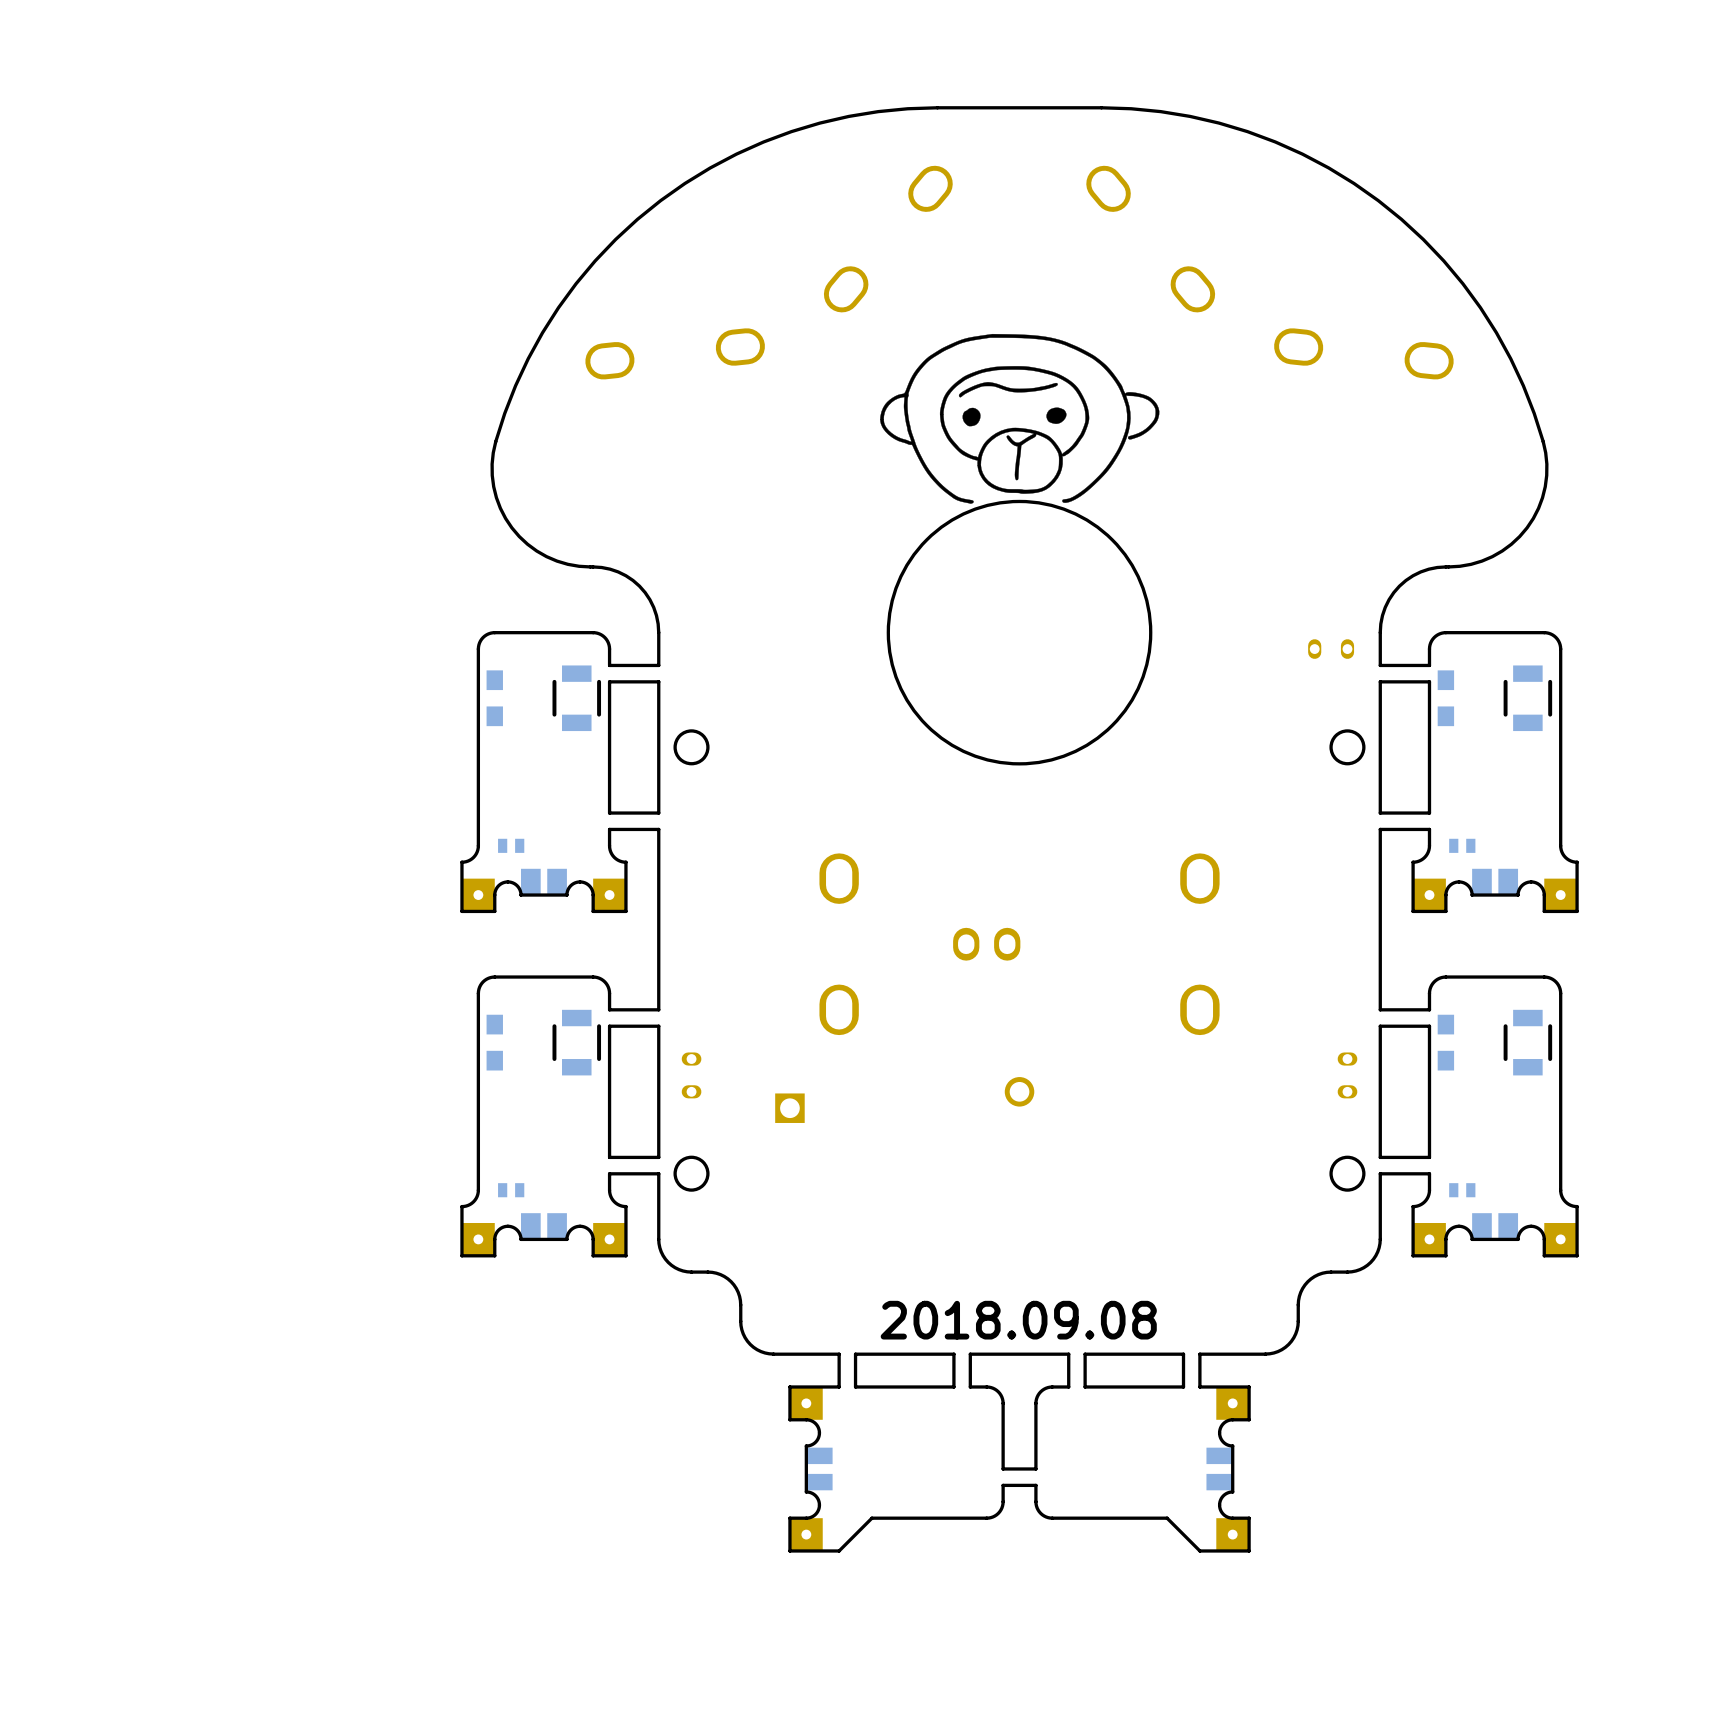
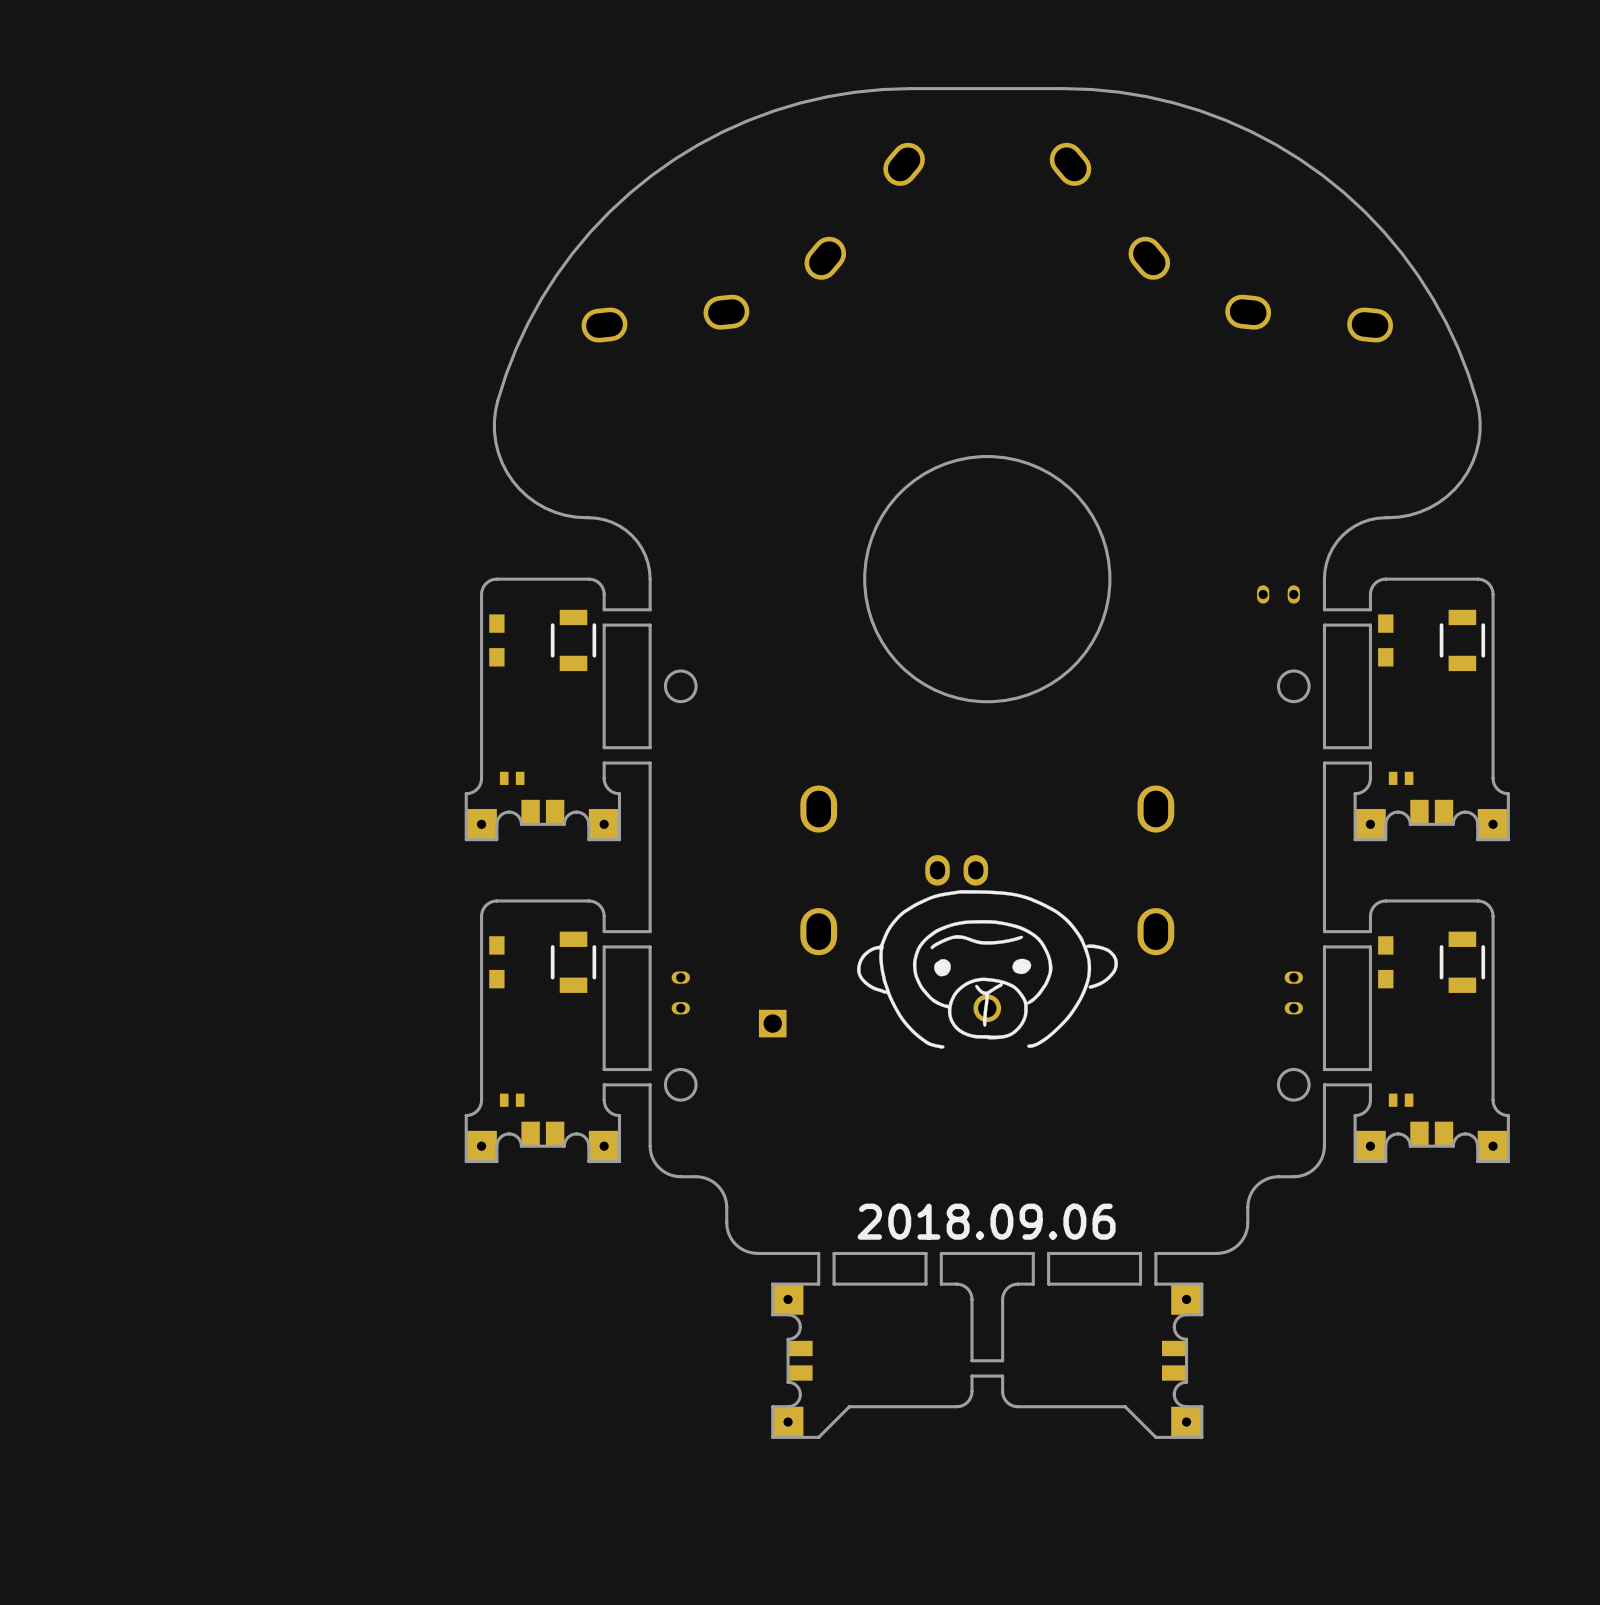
drawing position: (1019, 418) -> (987, 969)
text: 2018.09.08 (1018, 1320) -> 2018.09.06 (986, 1221)

